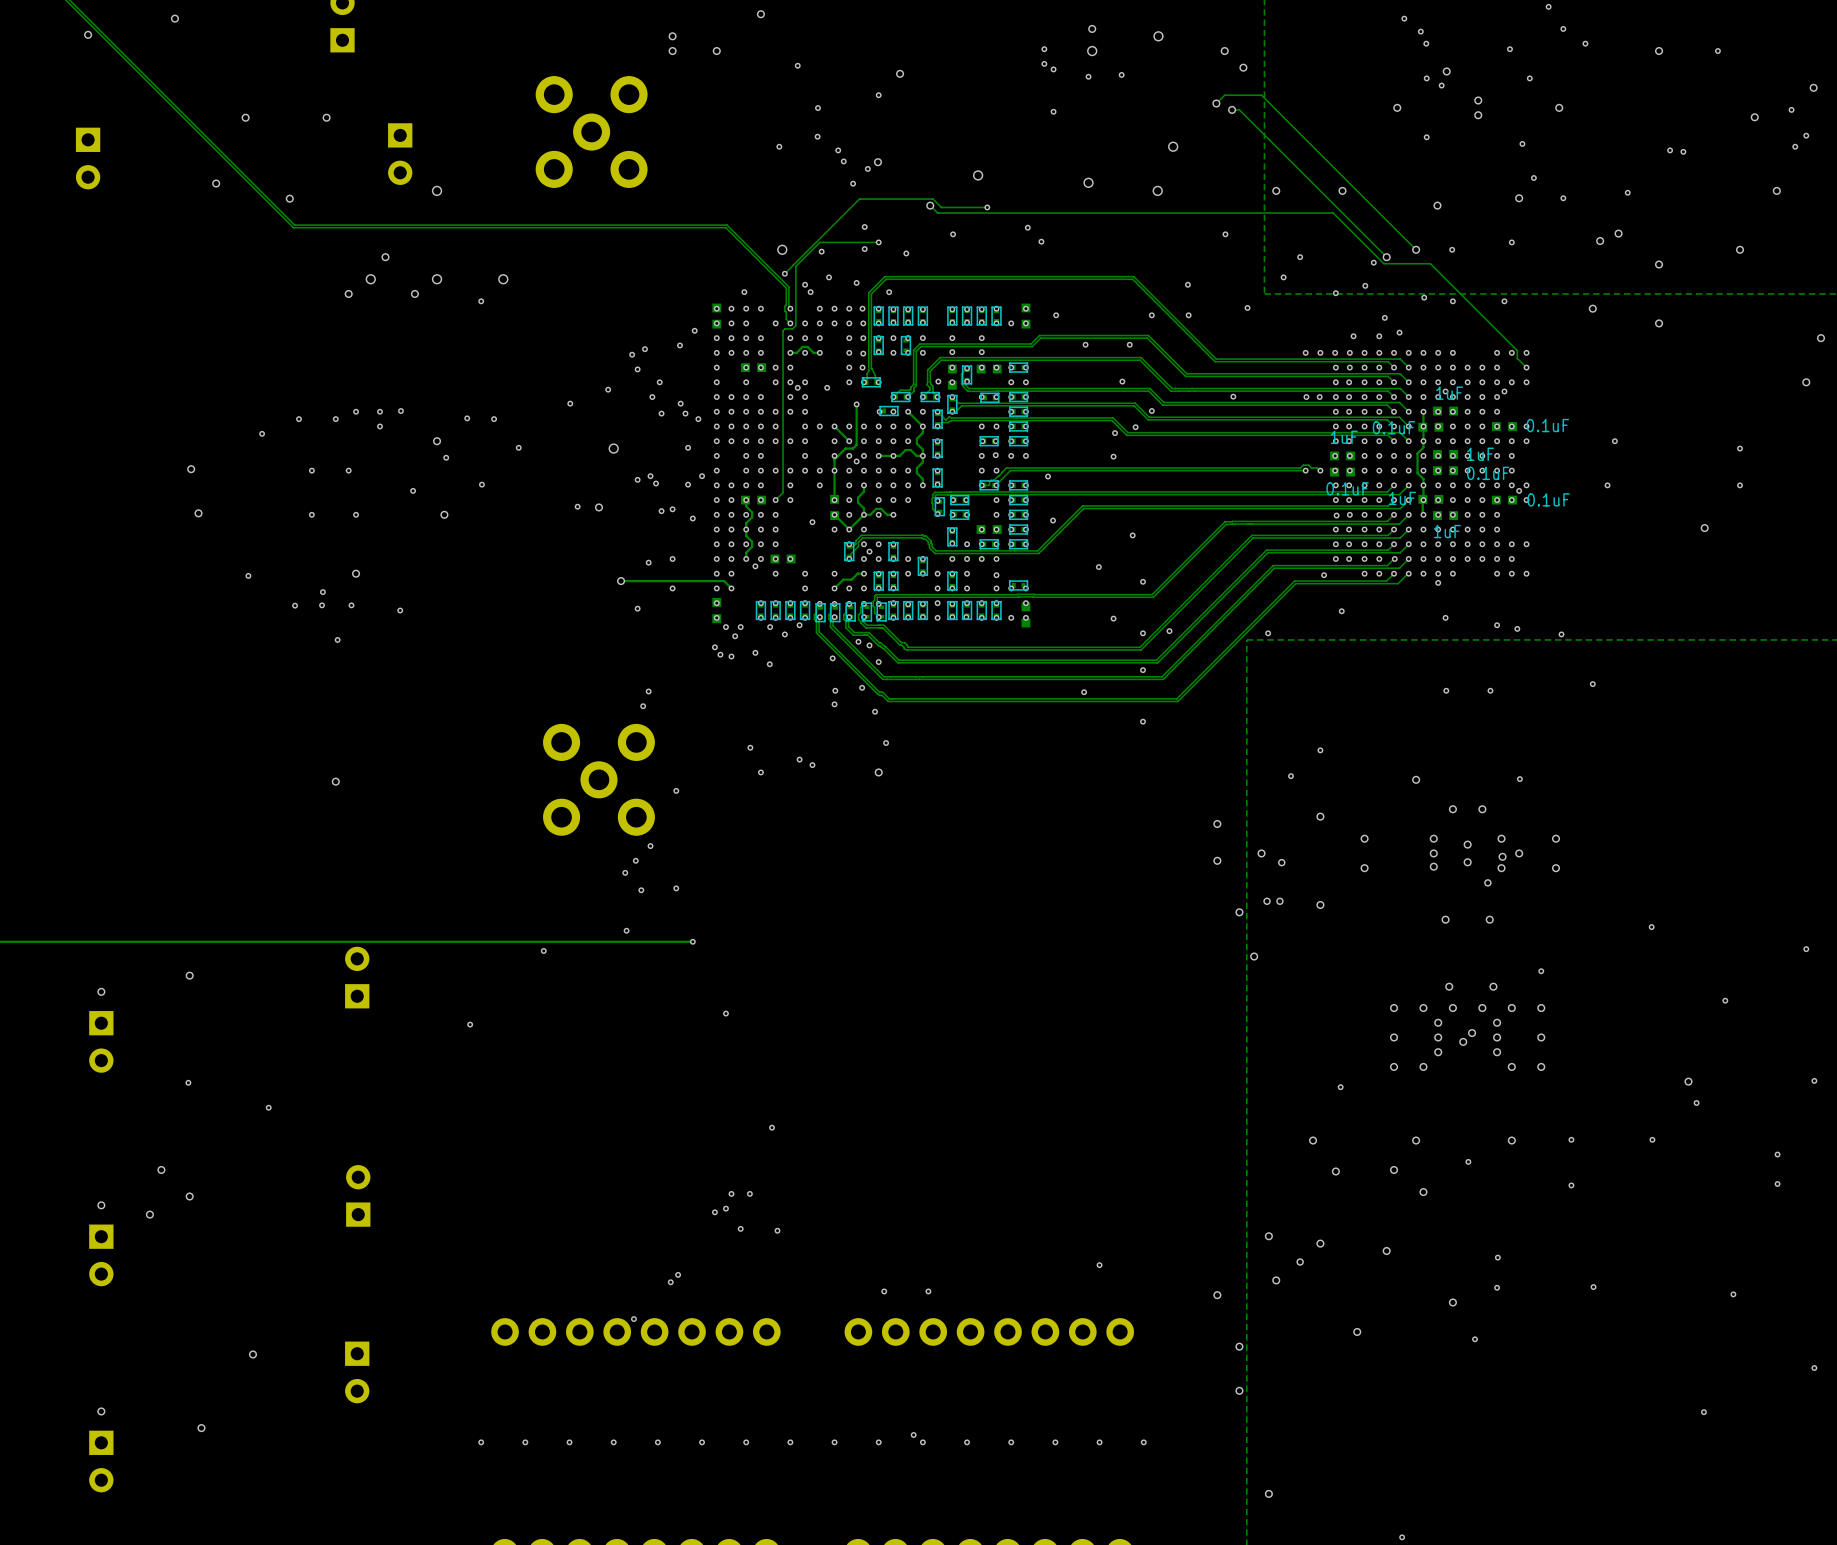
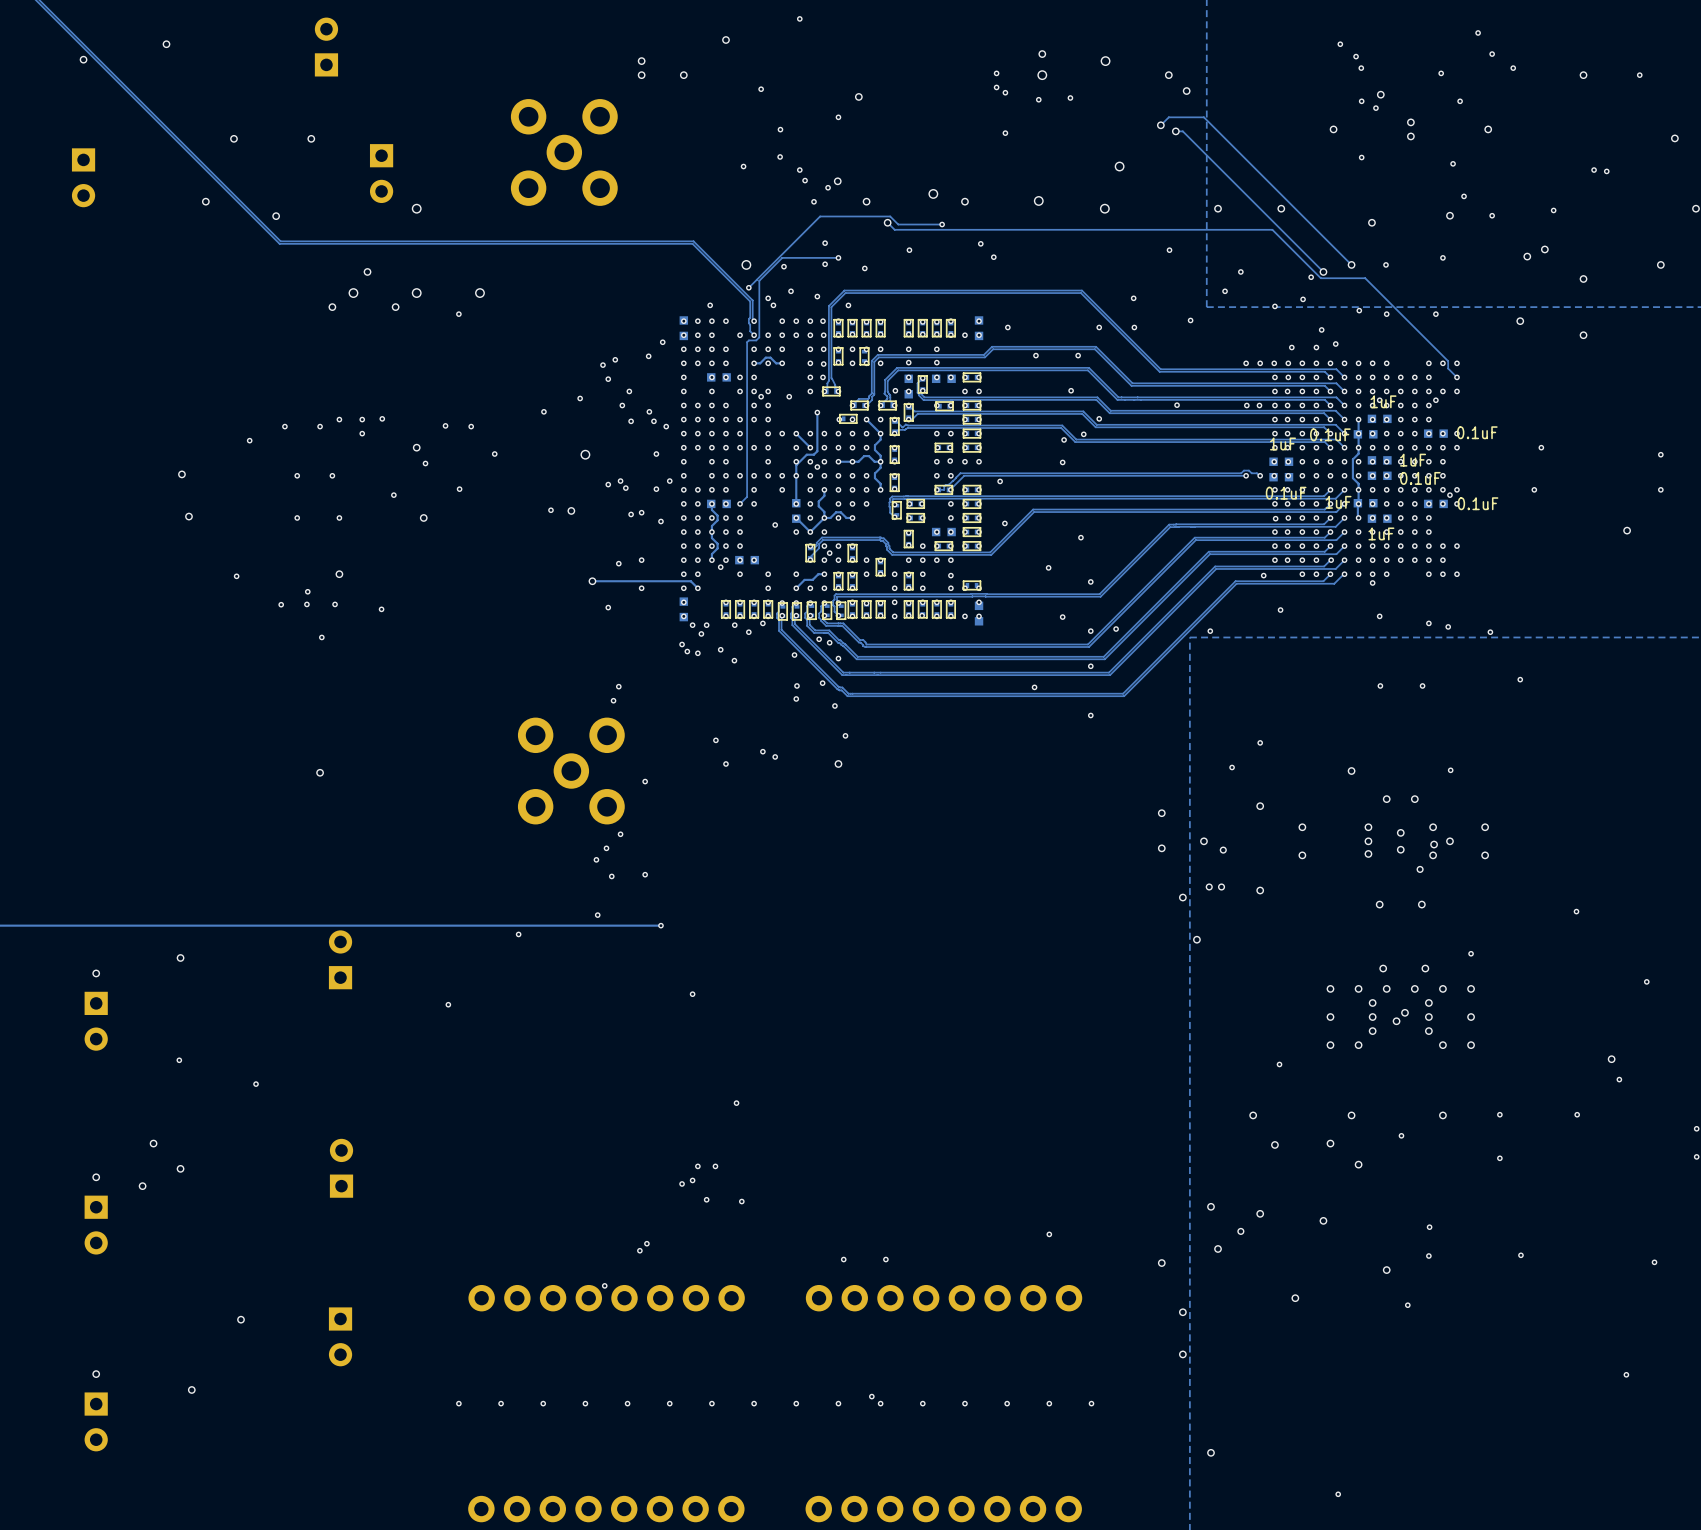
via: none -> (866, 201)
via: none -> (964, 201)

